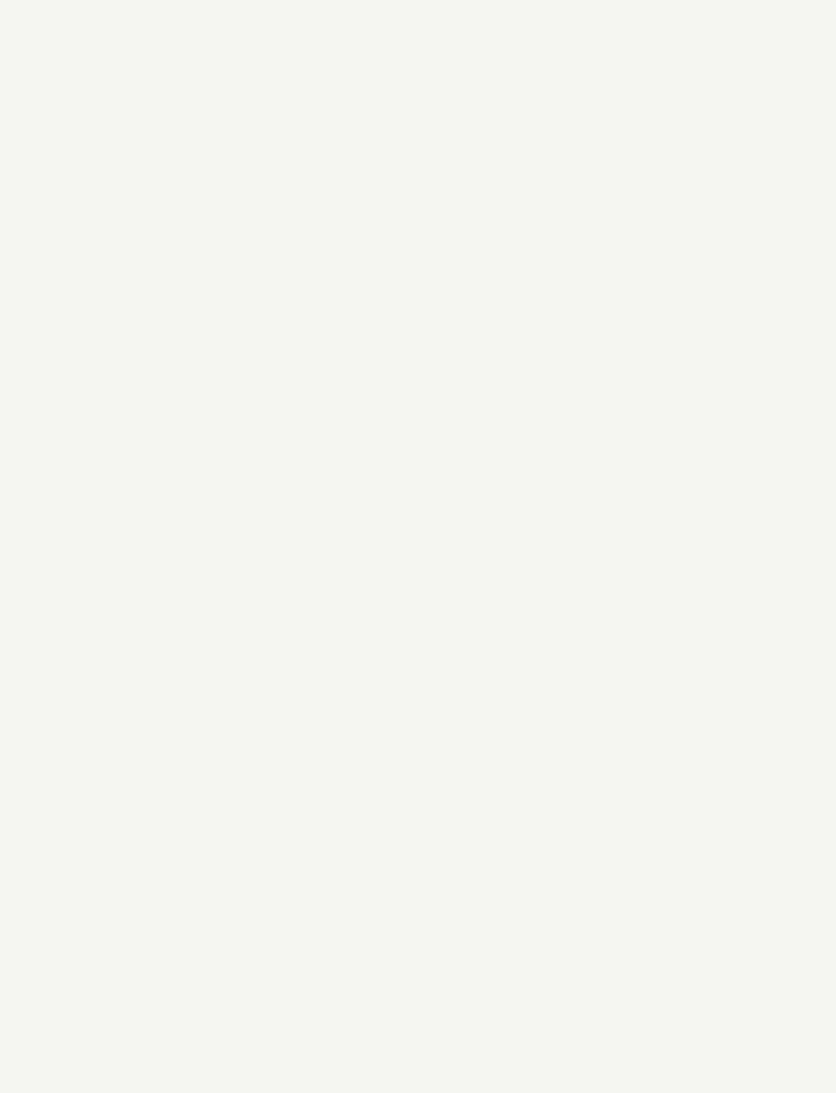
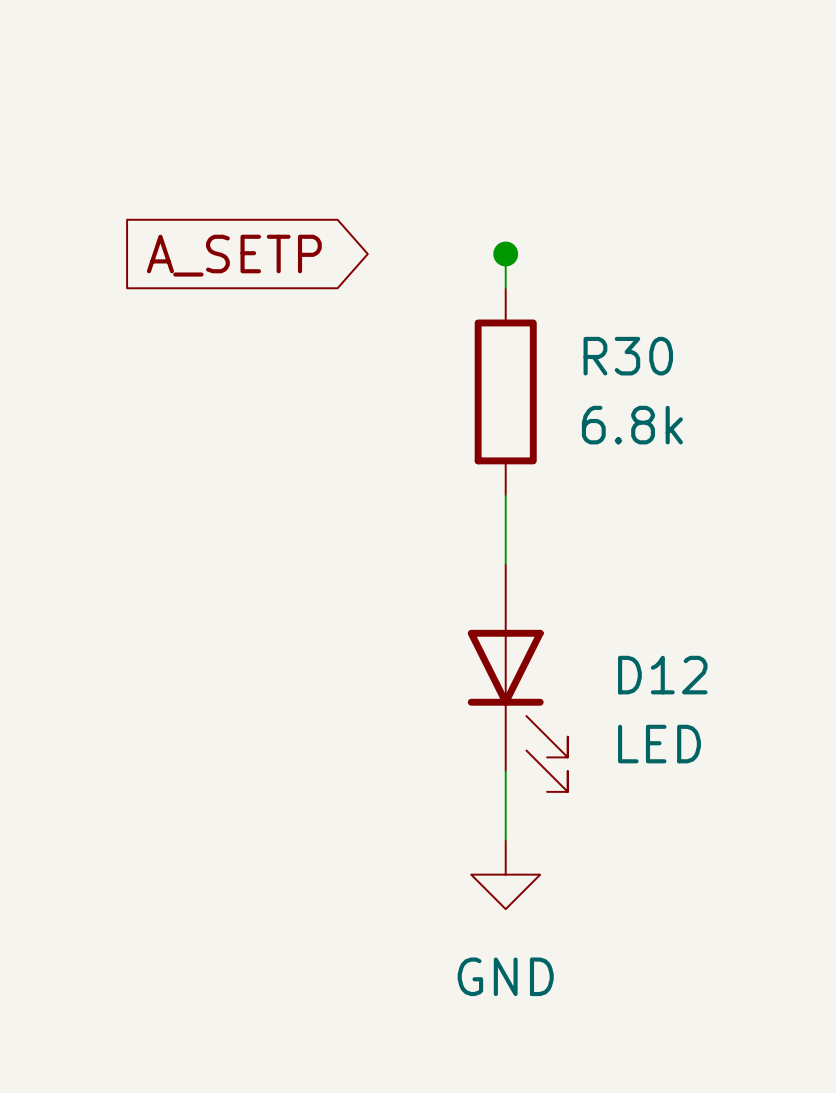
wire: none -> (505, 254) (505, 288)
junction: none -> (505, 254)
global label: none -> A_SETP (234, 255)
R30: none -> 6.8k (505, 391)
wire: none -> (505, 495) (505, 564)
D12: none -> LED (517, 678)
wire: none -> (505, 771) (505, 840)
power symbol: none -> GND (505, 874)

